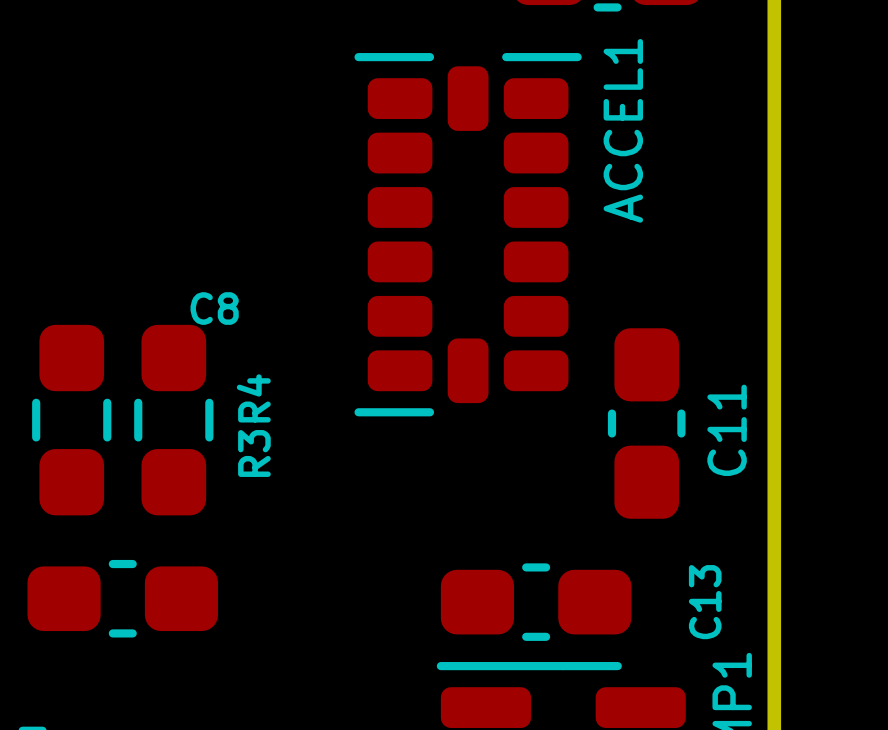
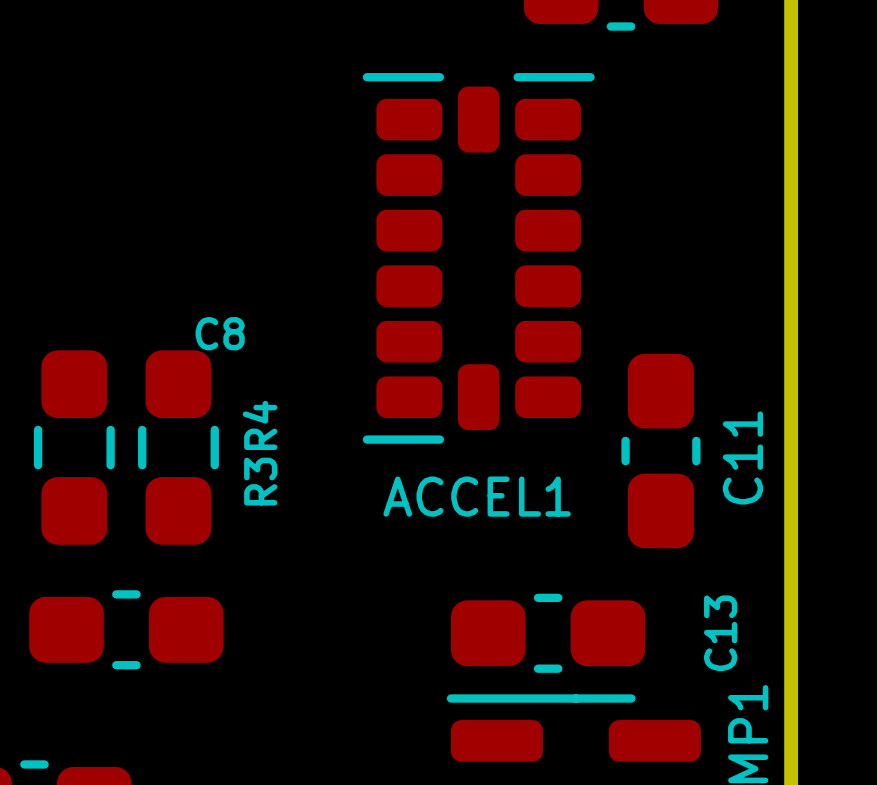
ACCEL1 name rotation: 0° (623, 130) -> 90° clockwise (477, 496)
ACCEL1 name position: ACCEL1 (623, 130) -> ACCEL1 (477, 496)

